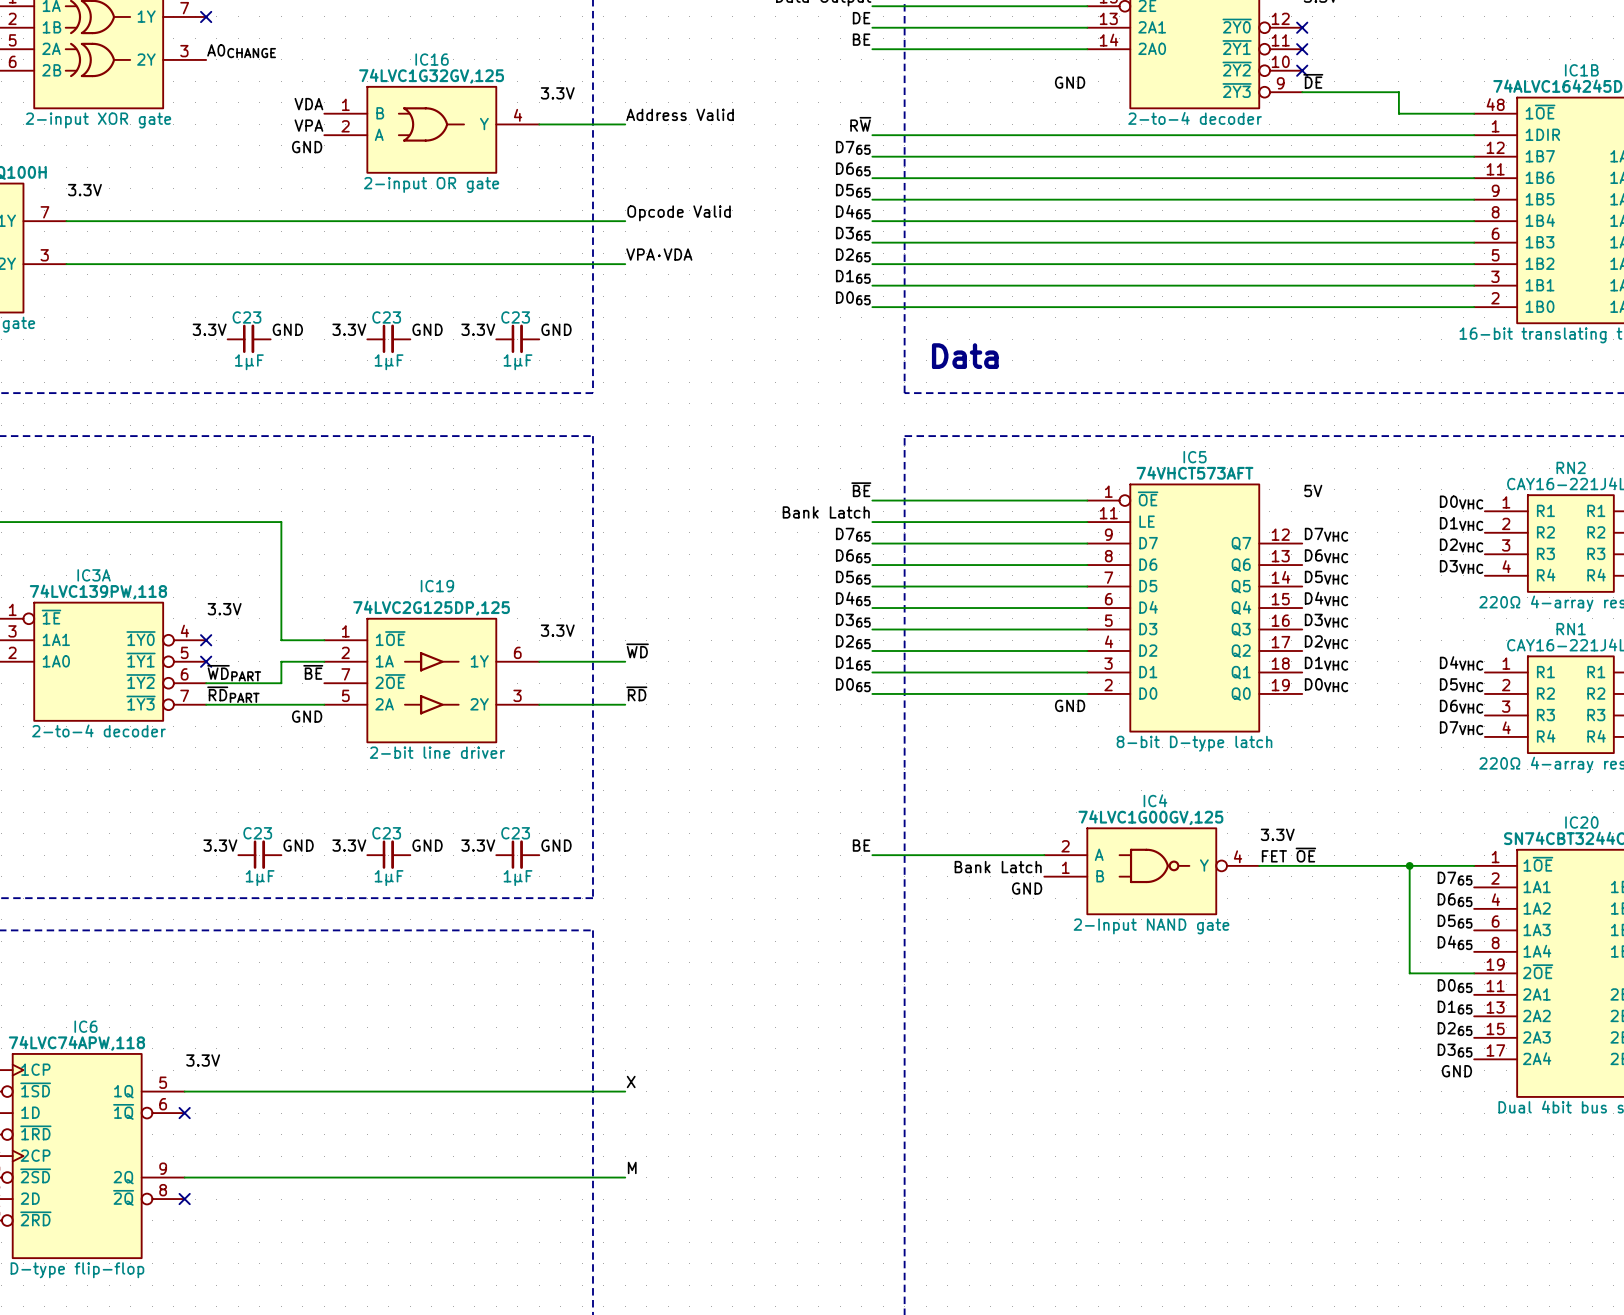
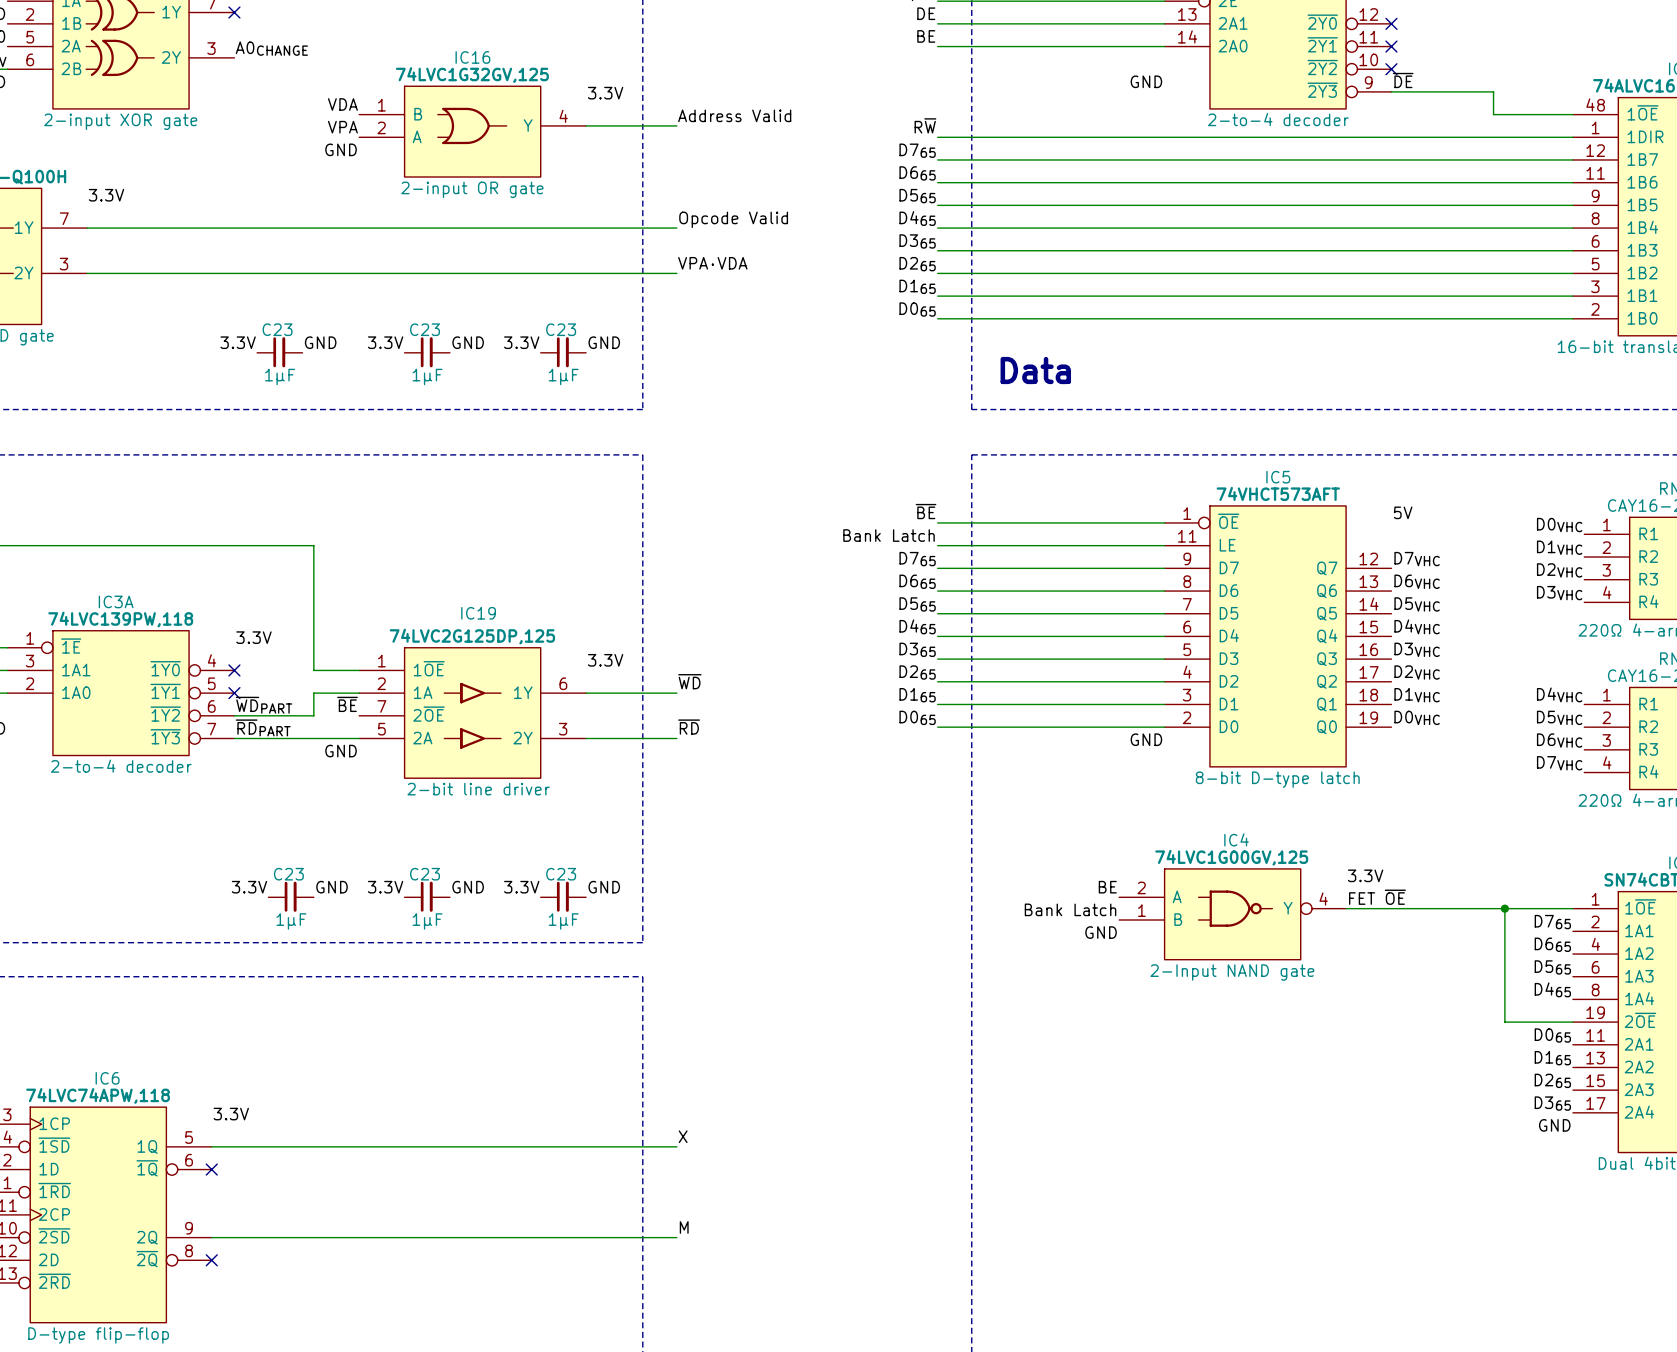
label position: BE (861, 845) -> BE (1107, 887)
wire: (872, 855) (1044, 855) -> none

